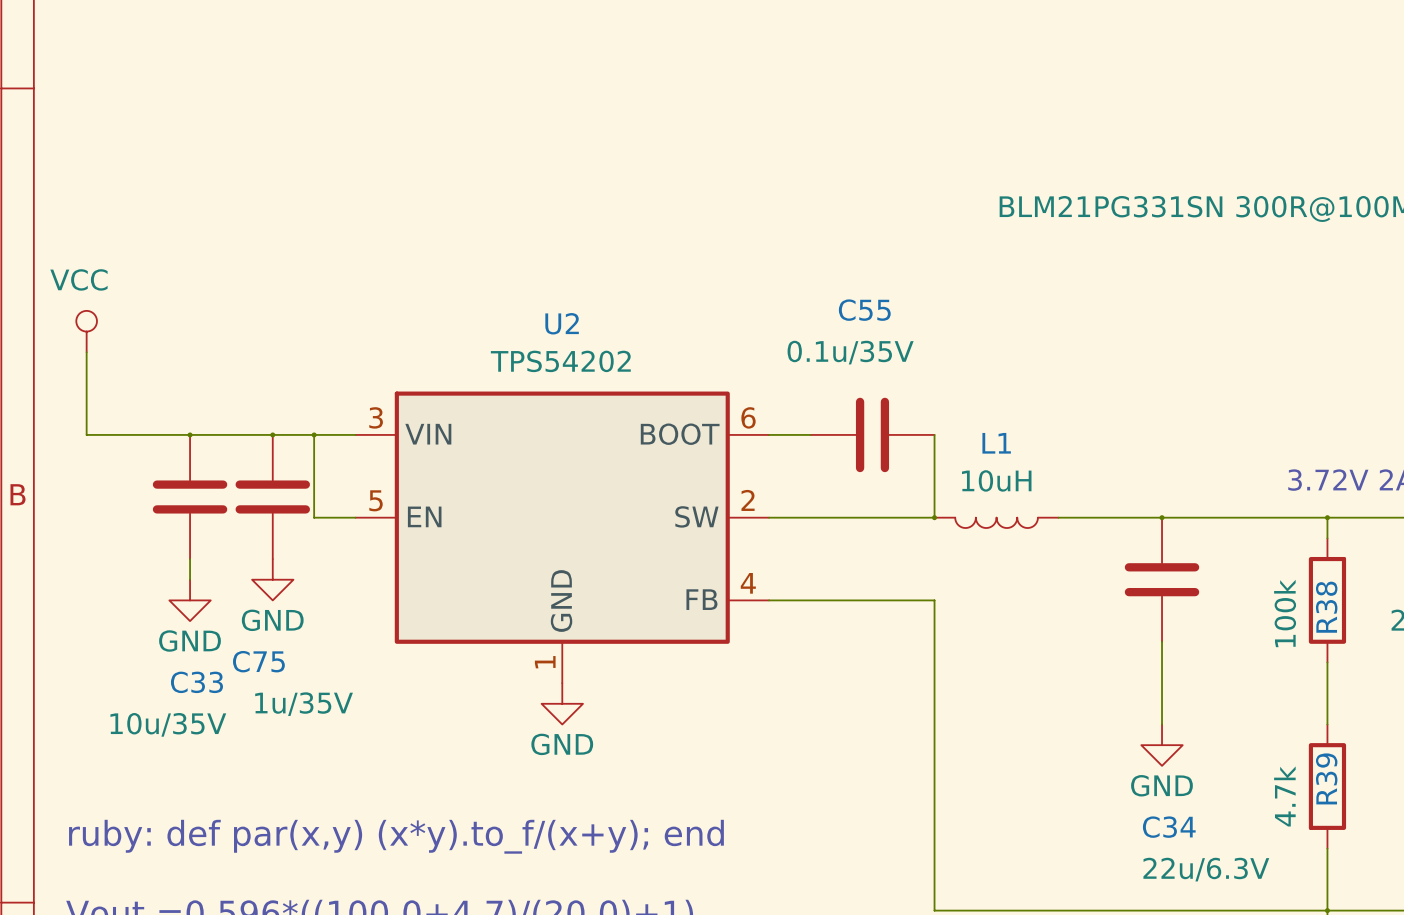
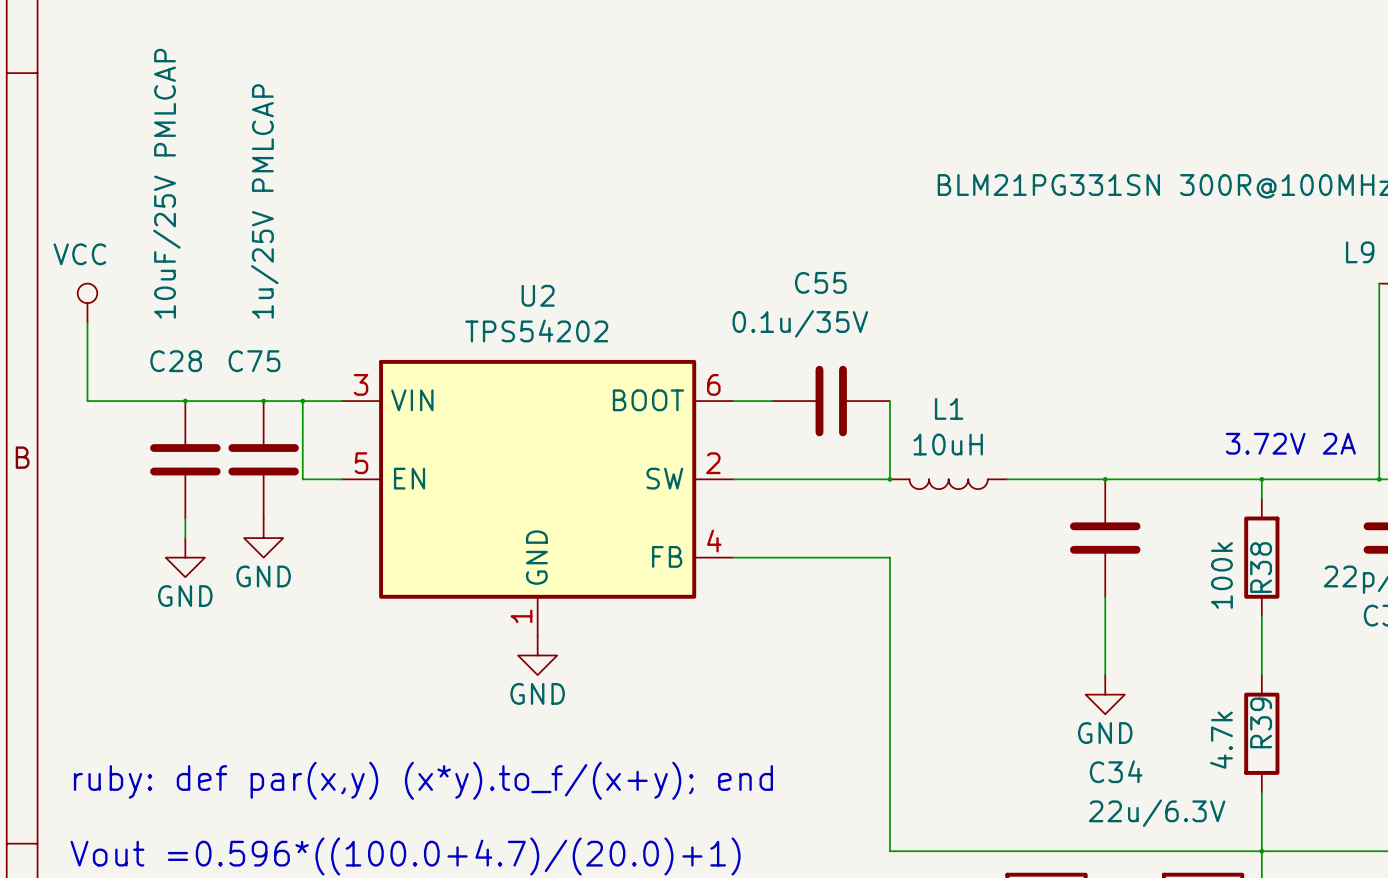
C75 name position: C75 (258, 661) -> C75 (254, 361)
C33 name: C33 (196, 682) -> C28 (176, 361)
C75 value: 1u/35V (304, 704) -> 1u/25V PMLCAP (264, 201)
C33 value: 10u/35V (168, 724) -> 10uF/25V PMLCAP (166, 183)

